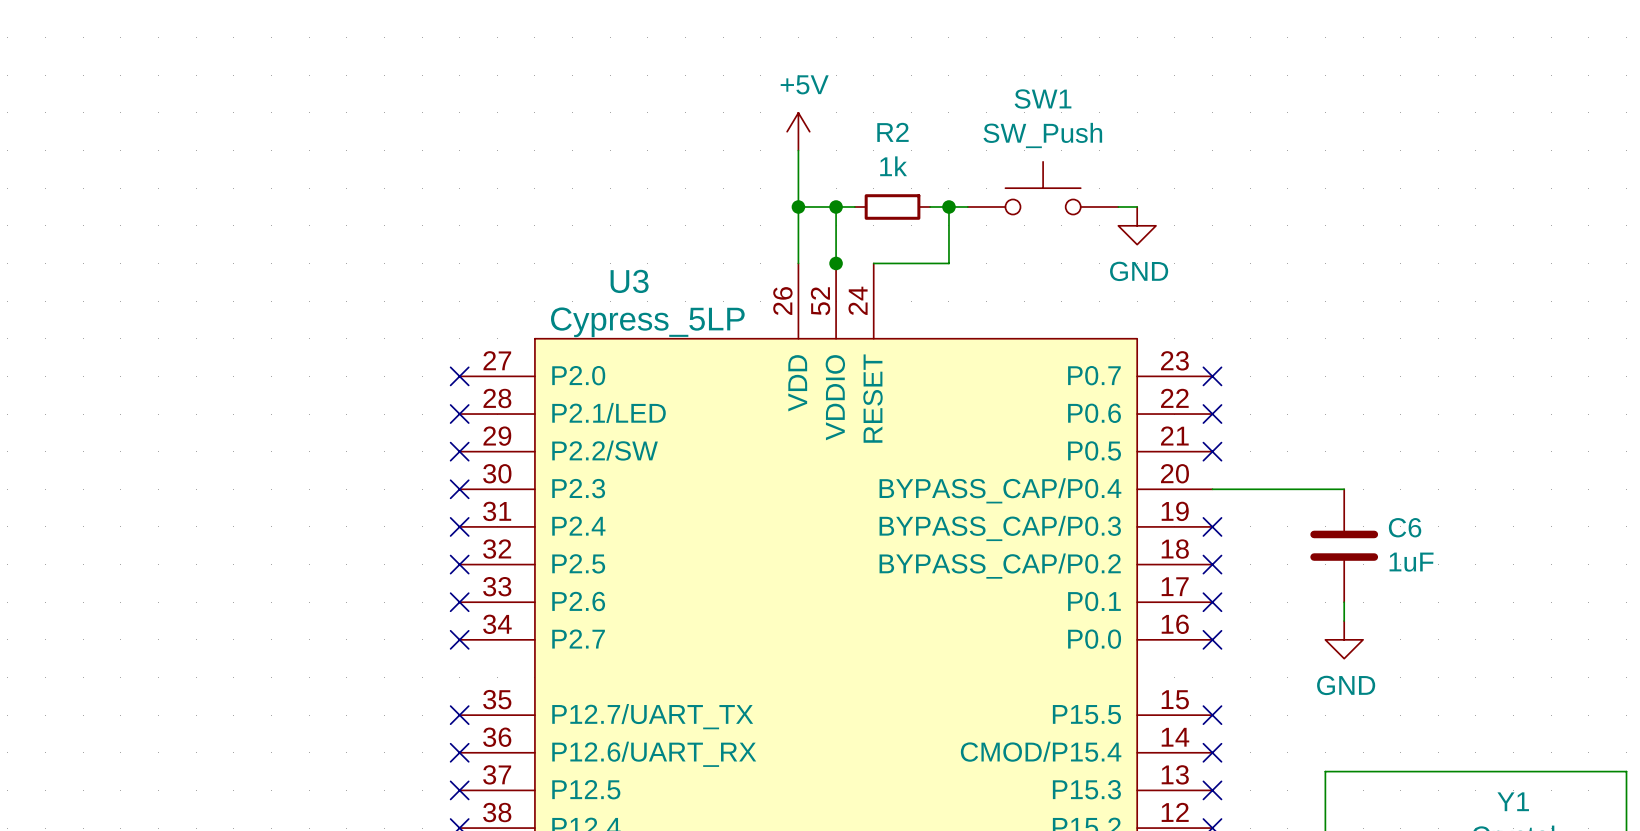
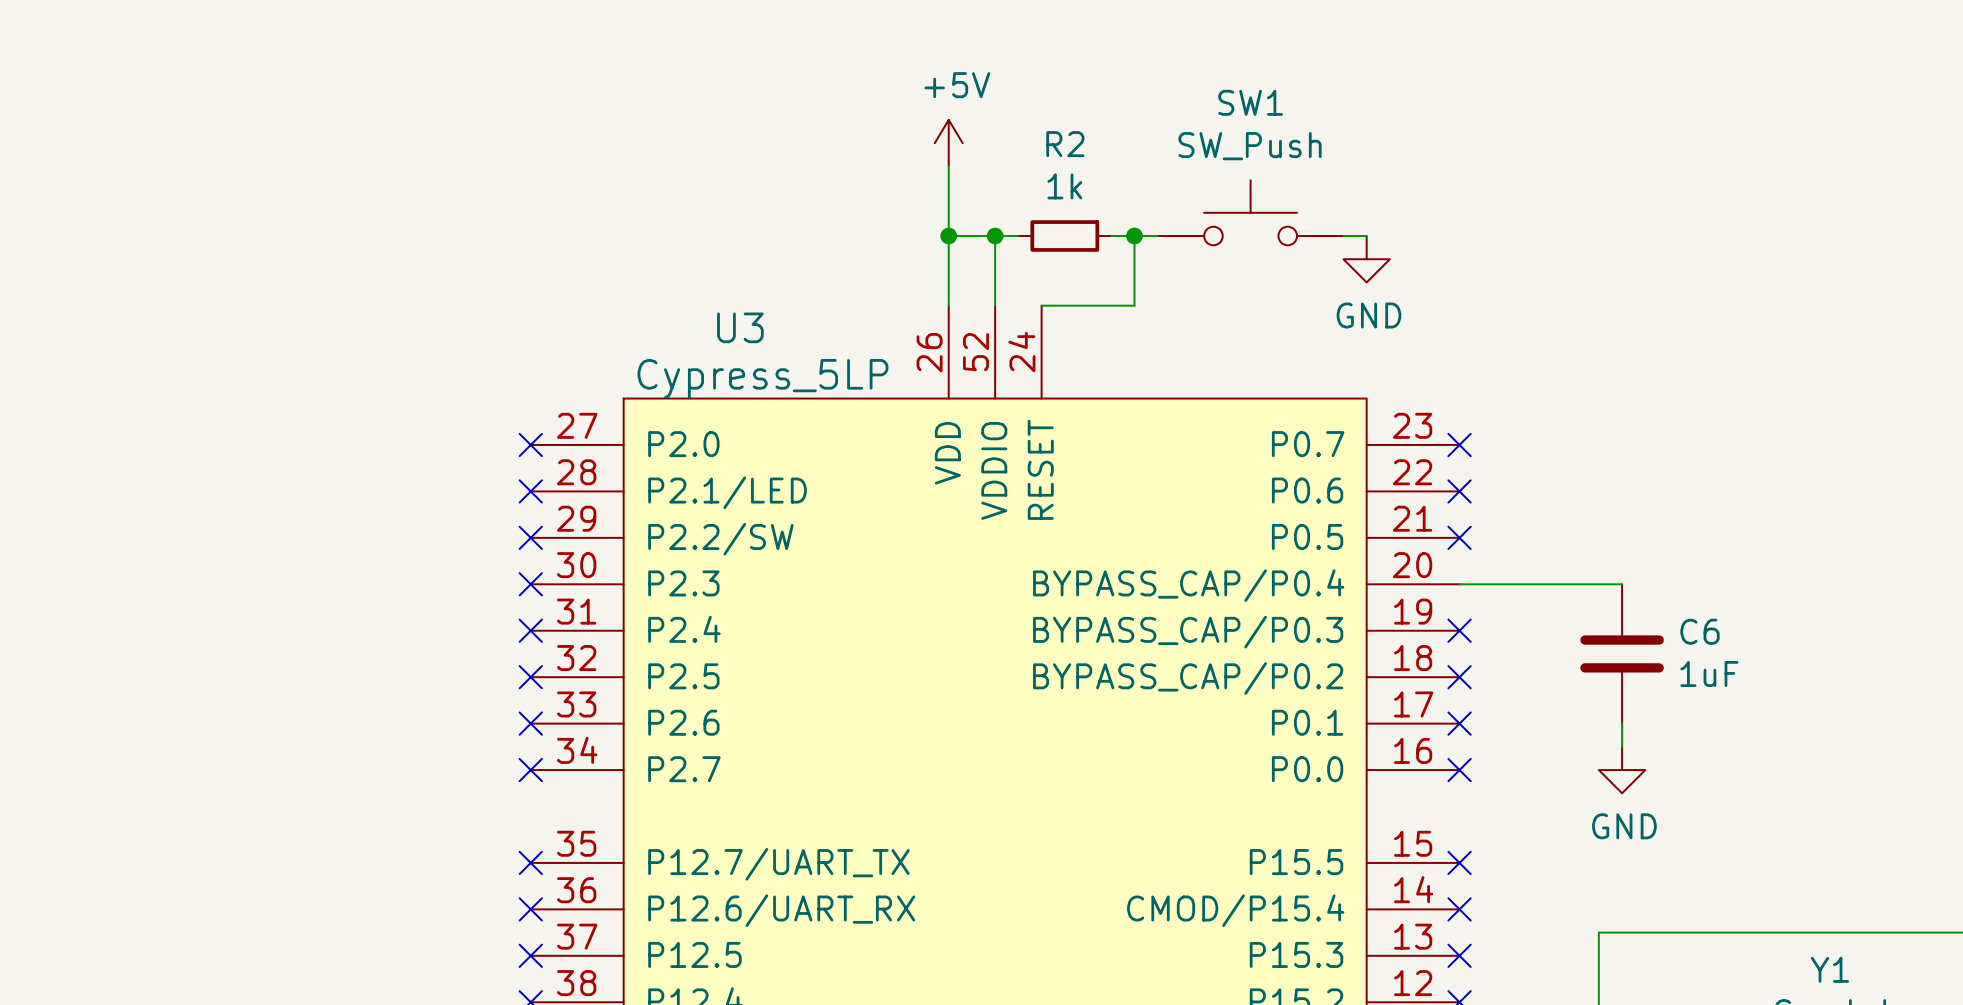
junction: (836, 263) -> none

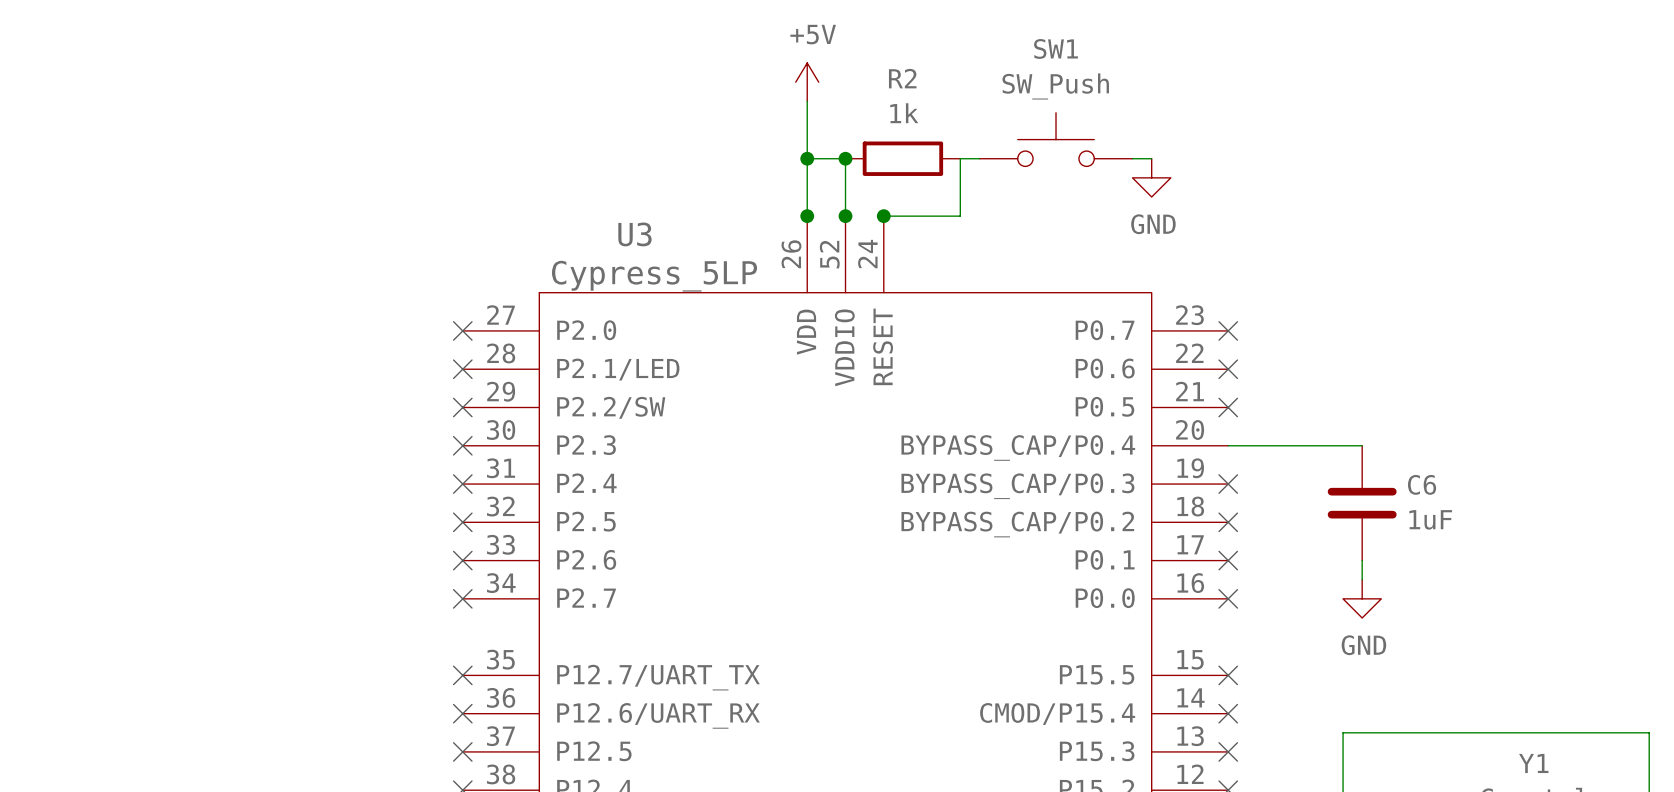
R2 symbol: [1018, 220, 1112, 252] -> [845, 141, 961, 176]
junction: (1134, 236) -> none
junction: none -> (807, 216)
junction: none -> (845, 216)
junction: none -> (883, 216)

